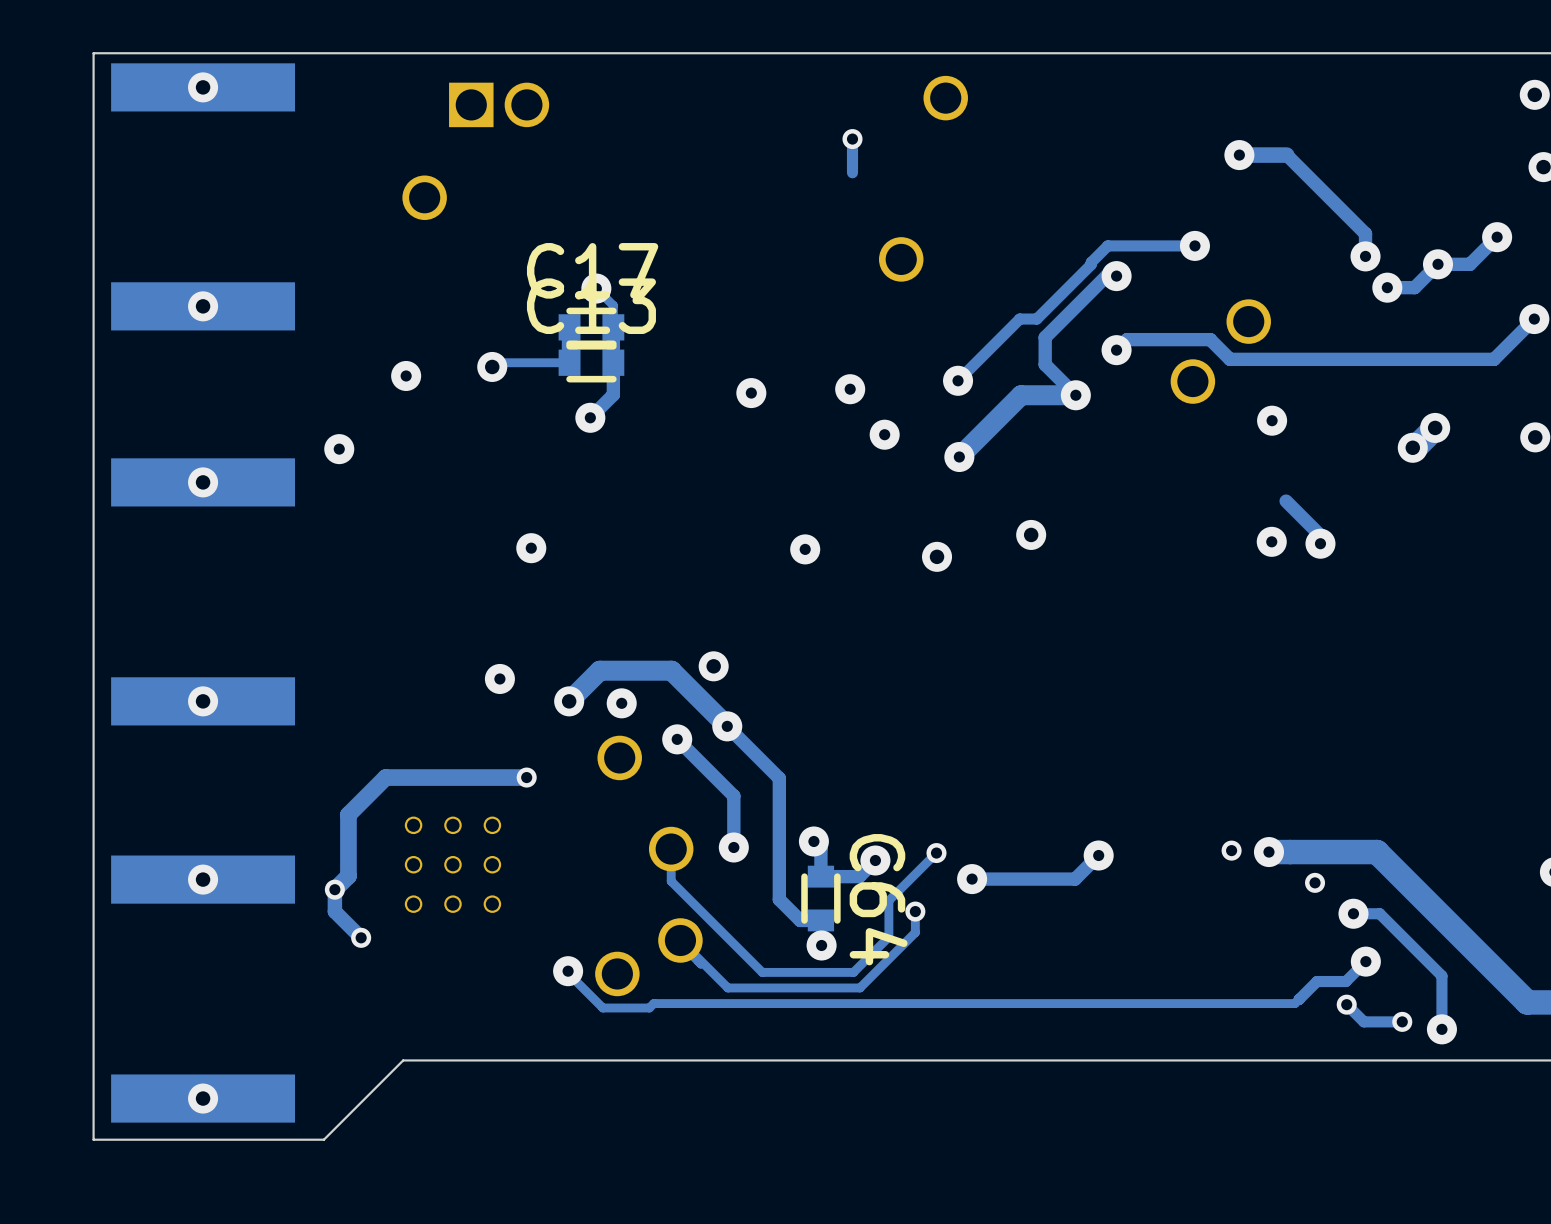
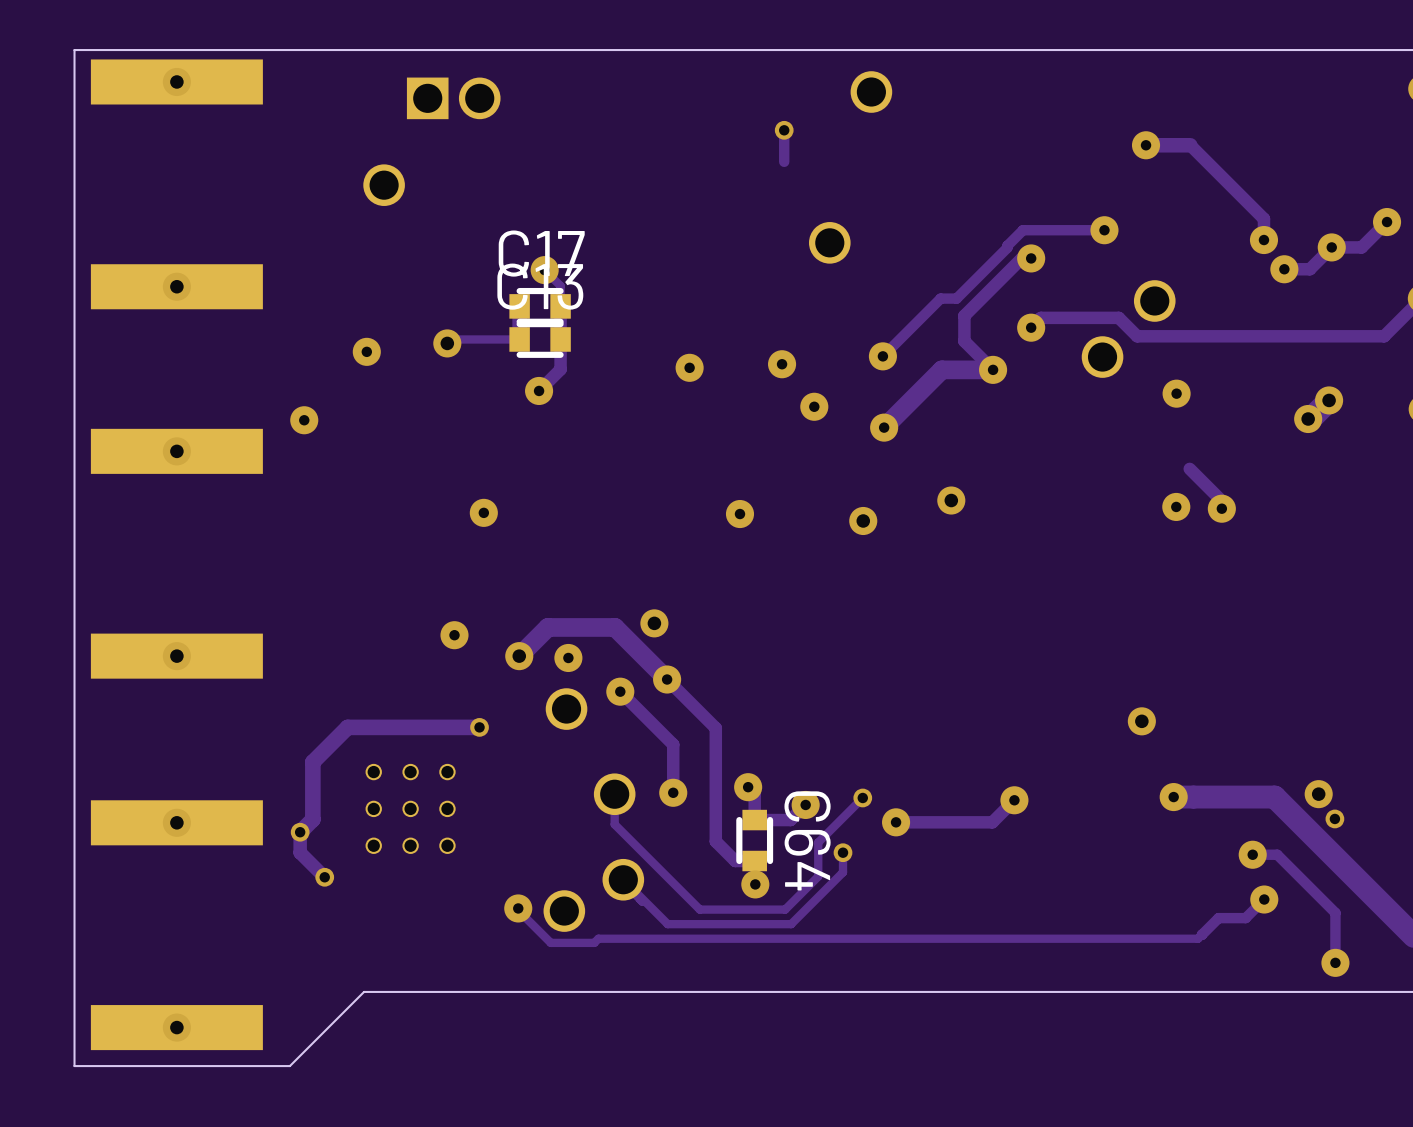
via: none -> (1141, 721)
via: none -> (1318, 794)
via: (1231, 850) -> none
via: none -> (1334, 818)
via: (1315, 882) -> none
track: (1346, 1004) (1363, 1021) (1402, 1021) -> none
via: (1346, 1004) -> none
via: (1402, 1021) -> none

